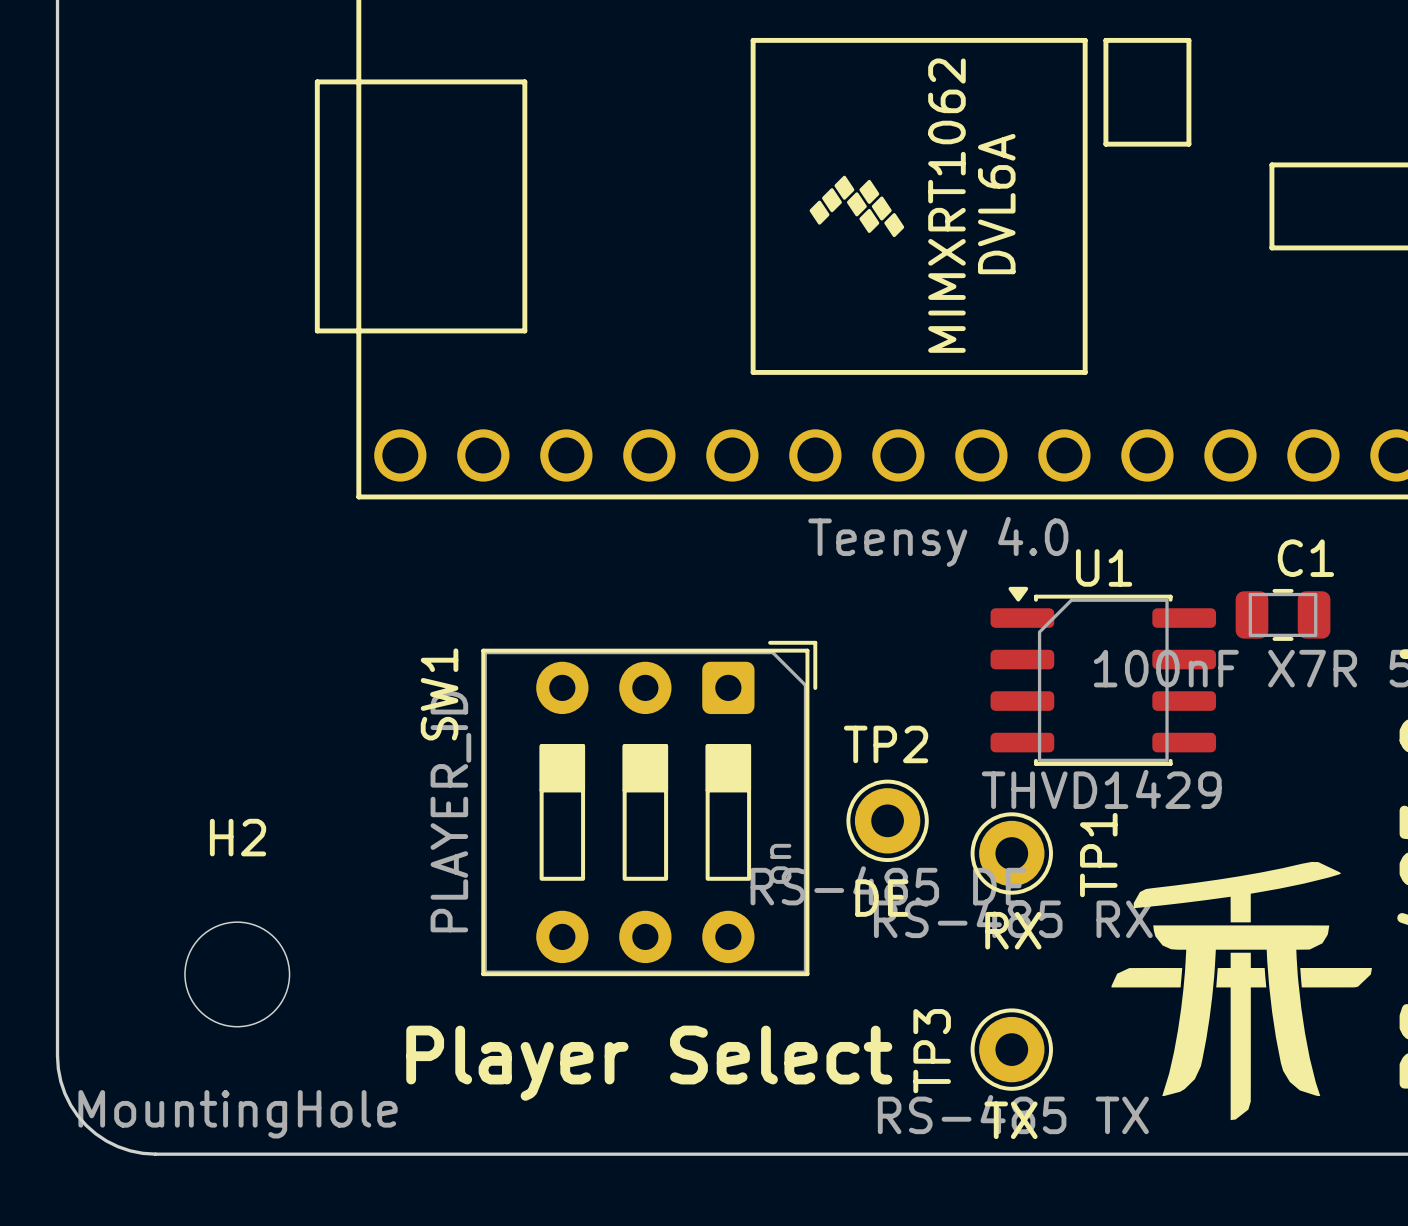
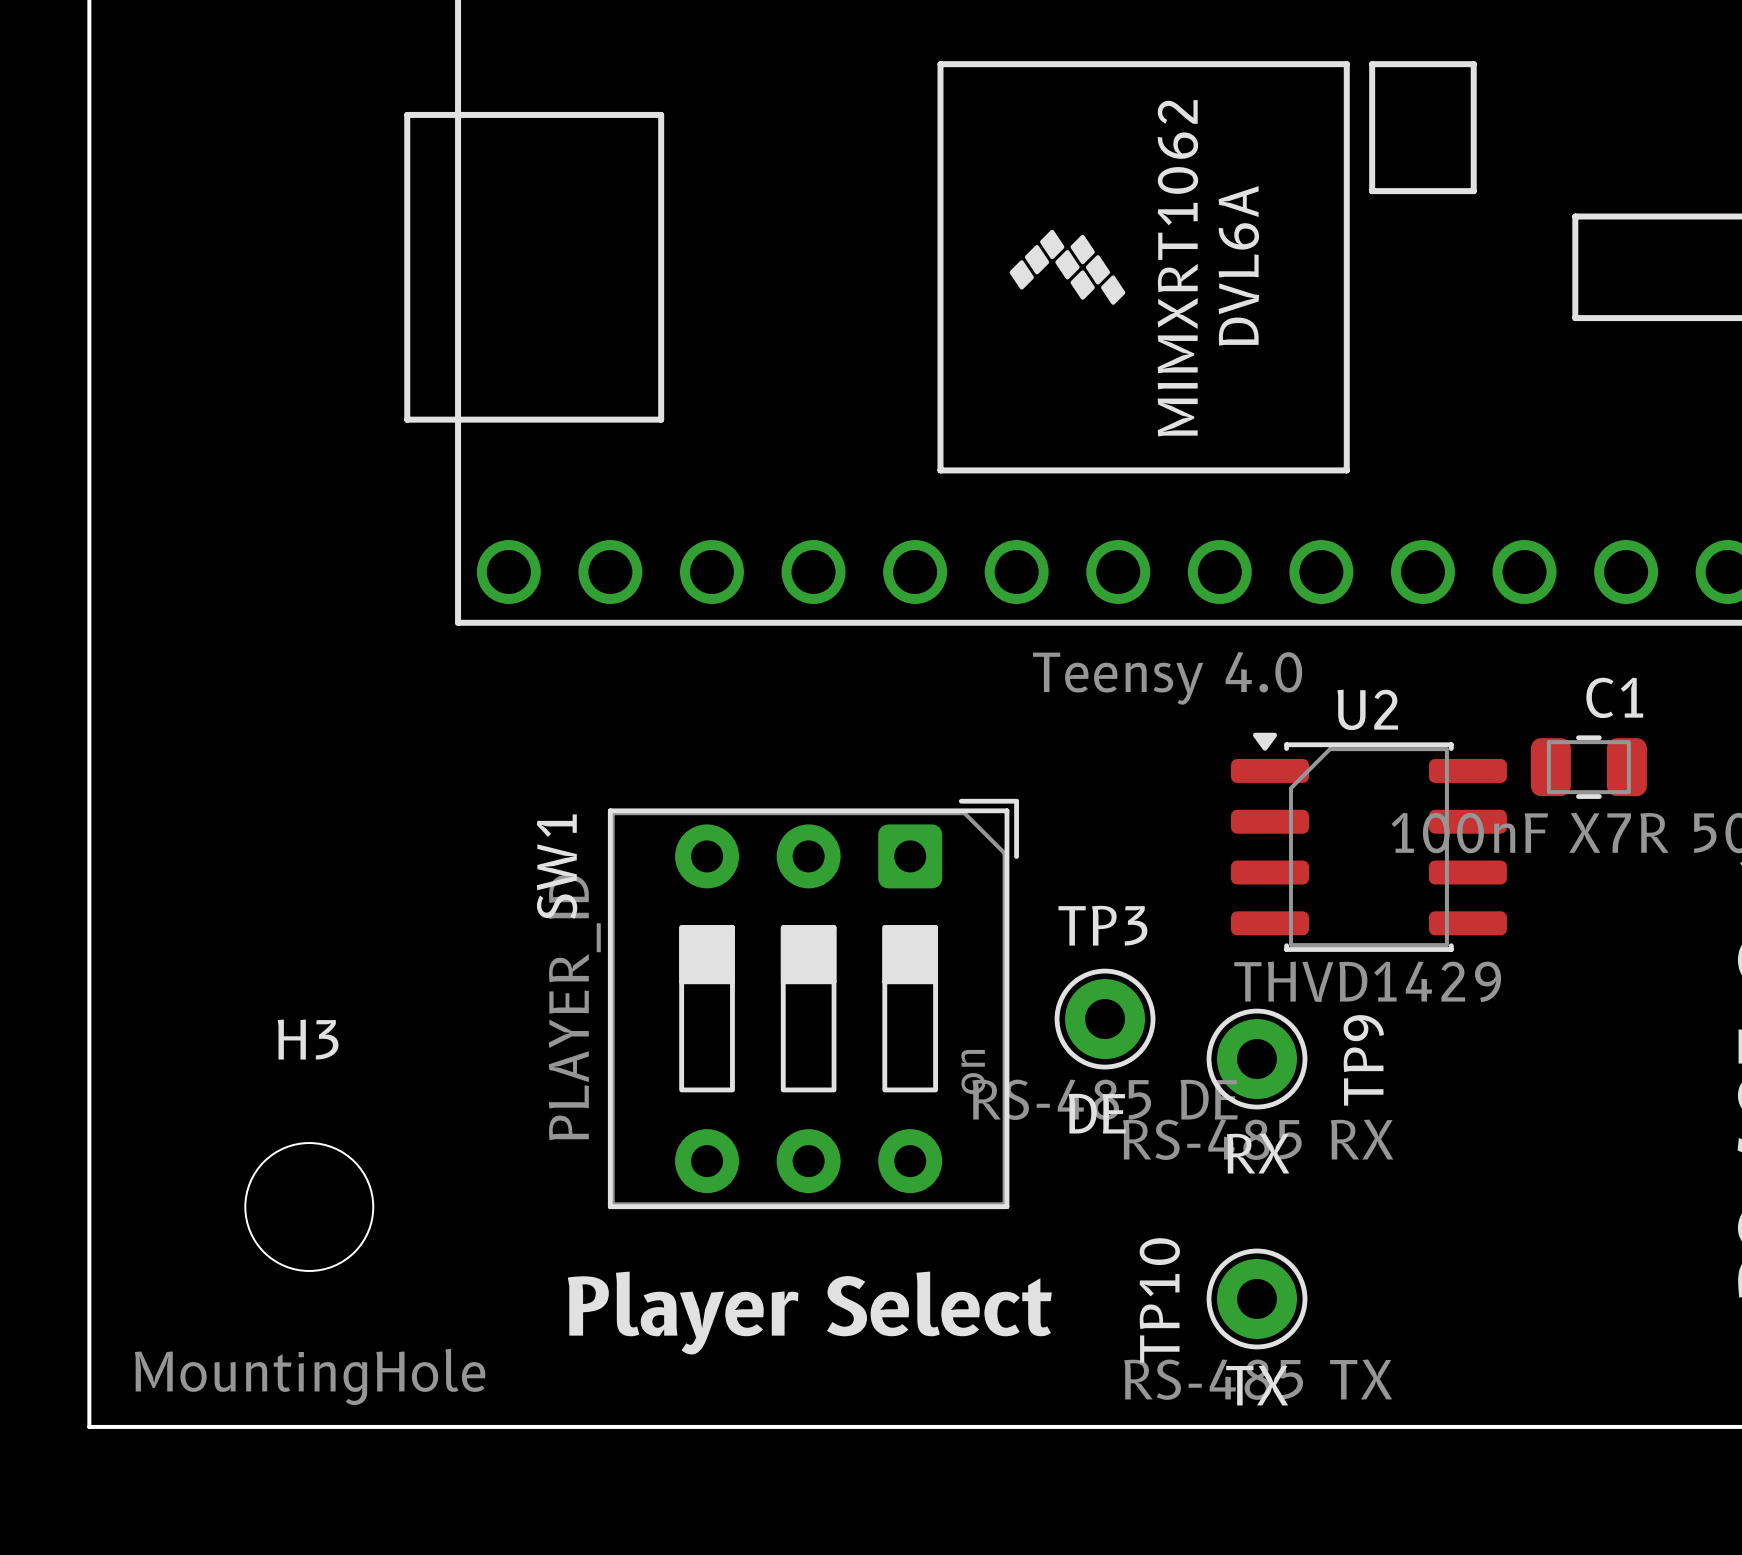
U1 name: U1 (1104, 567) -> U2 (1367, 709)
TP2 name: TP2 (886, 744) -> TP3 (1102, 925)
H2 name: H2 (238, 837) -> H3 (308, 1039)
TP1 name: TP1 (1098, 855) -> TP9 (1363, 1060)
drawing: [1111, 861, 1372, 1121] -> none
TP3 name: TP3 (932, 1051) -> TP10 (1159, 1300)
board edge: (57, 1056) (58, 1068) (64, 1093) (77, 1115) (86, 1125) (95, 1133) (118, 1146) (130, 1150) (155, 1154) -> (89, 1306) (89, 1426) (209, 1426)

